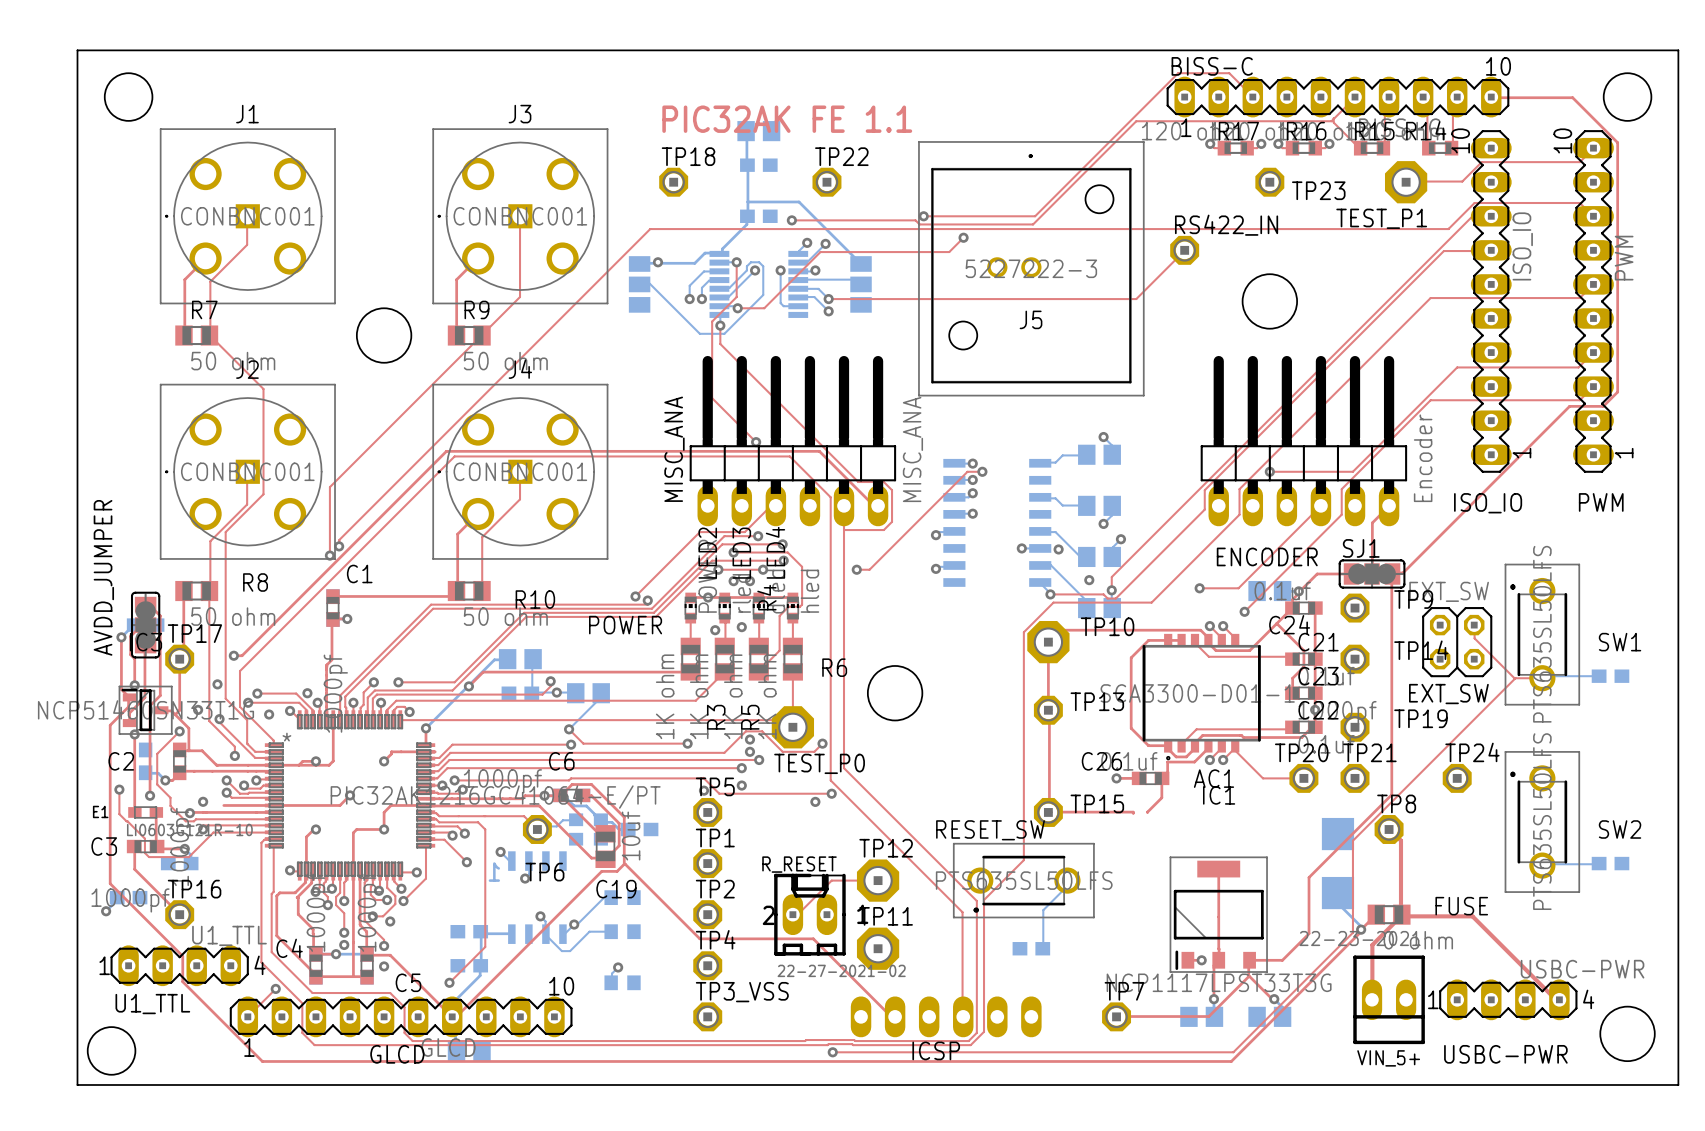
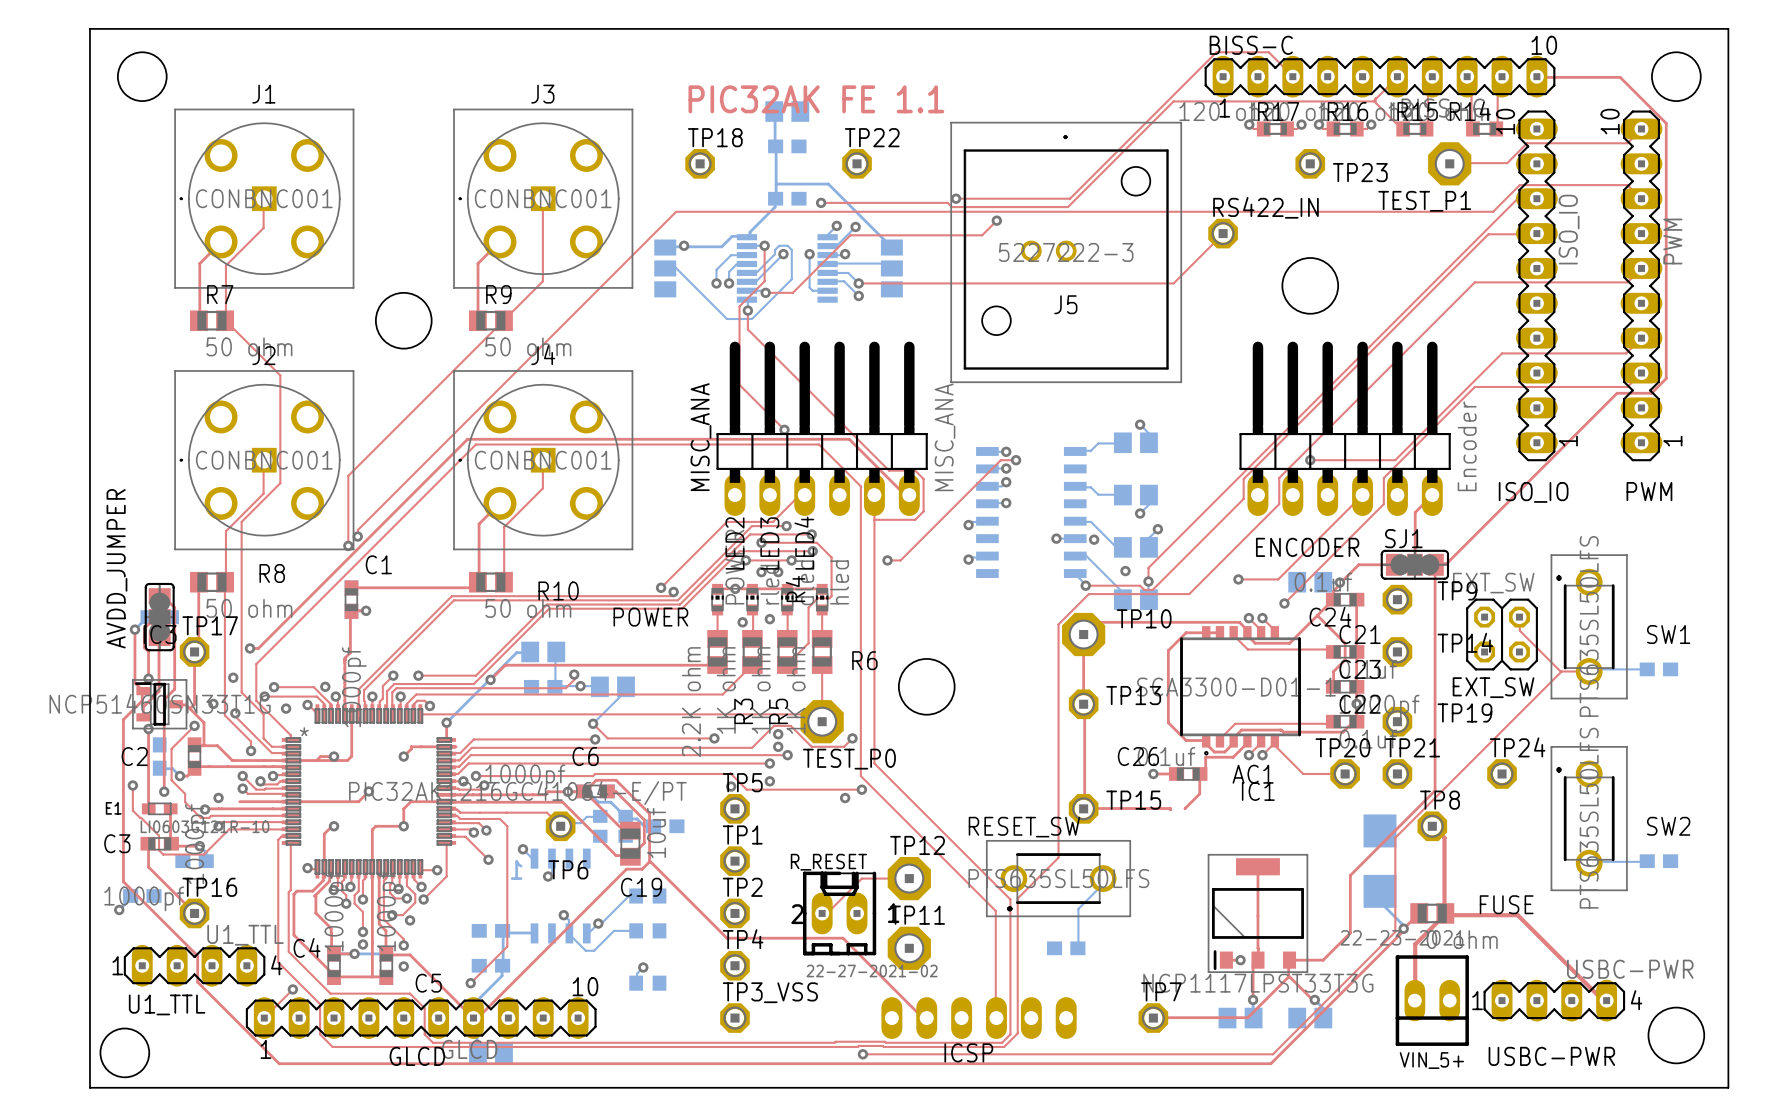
R3 value: 1K ohm (665, 696) -> 2.2K ohm (691, 702)

